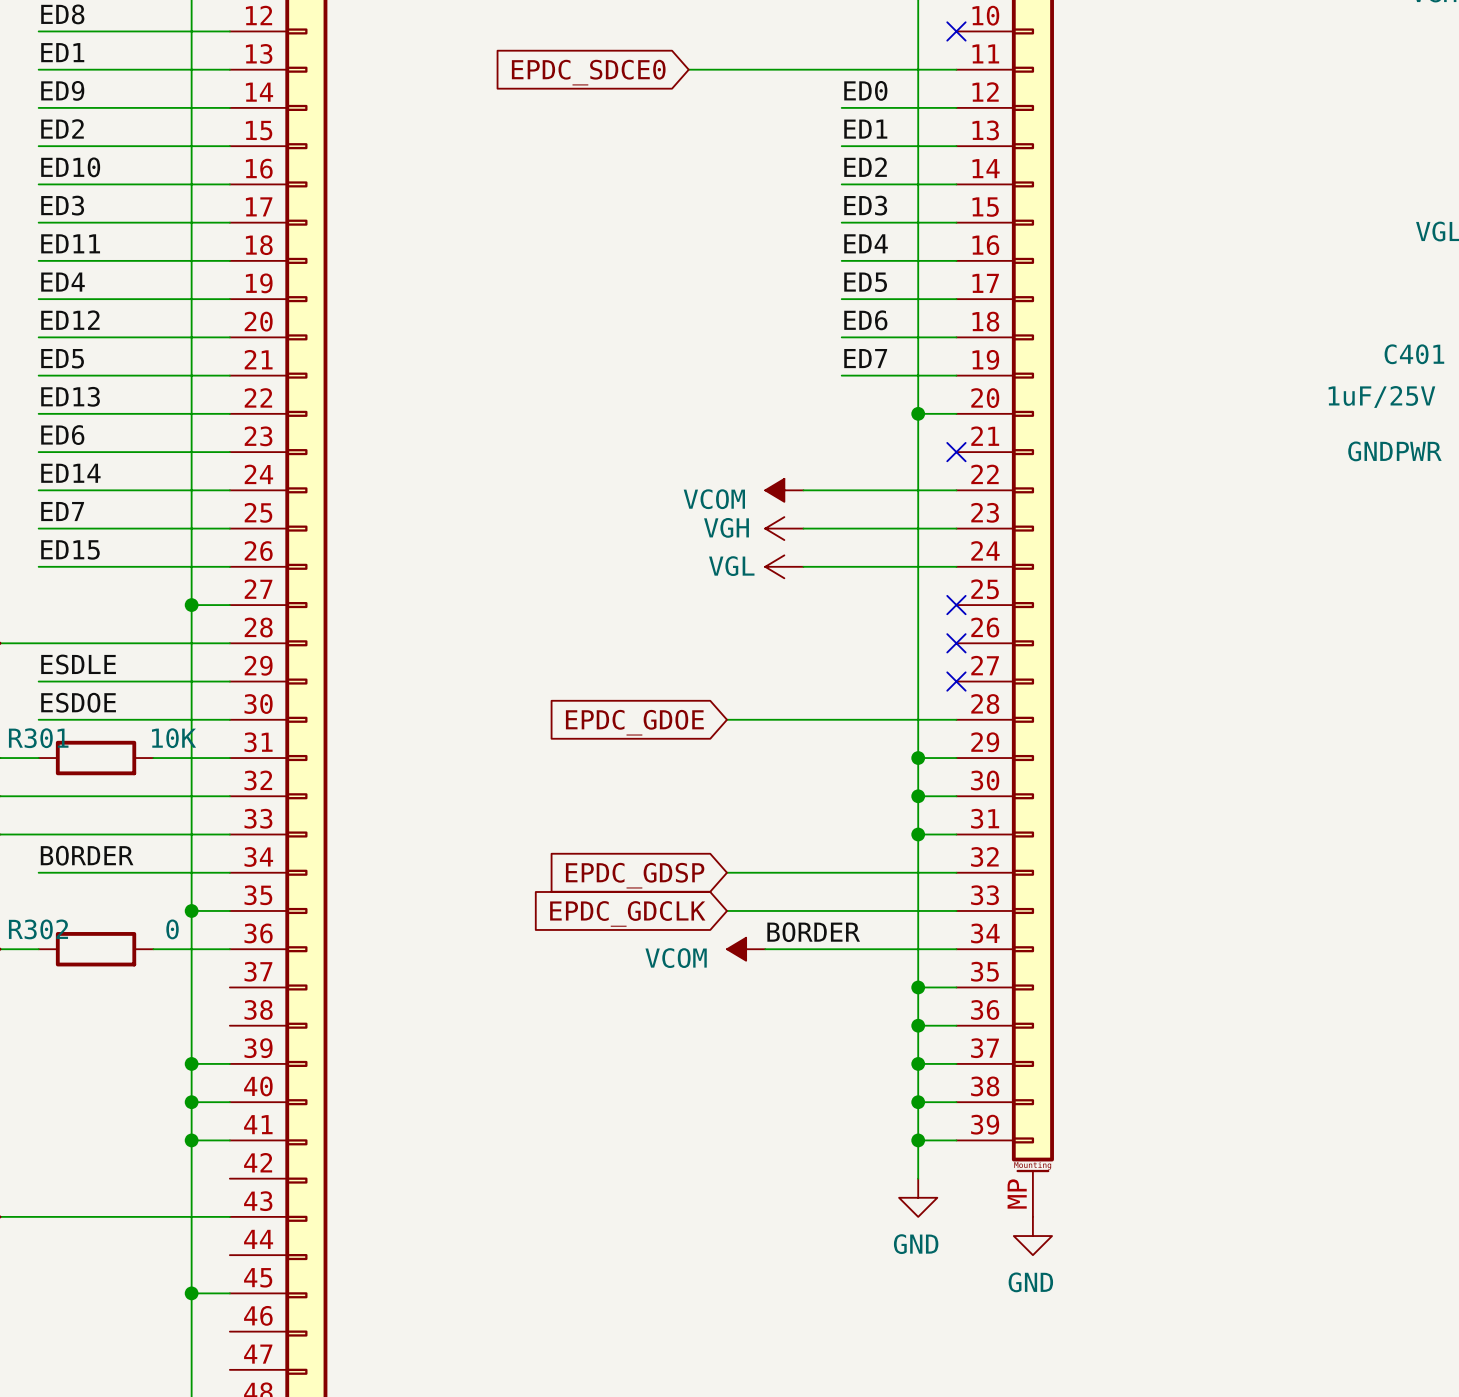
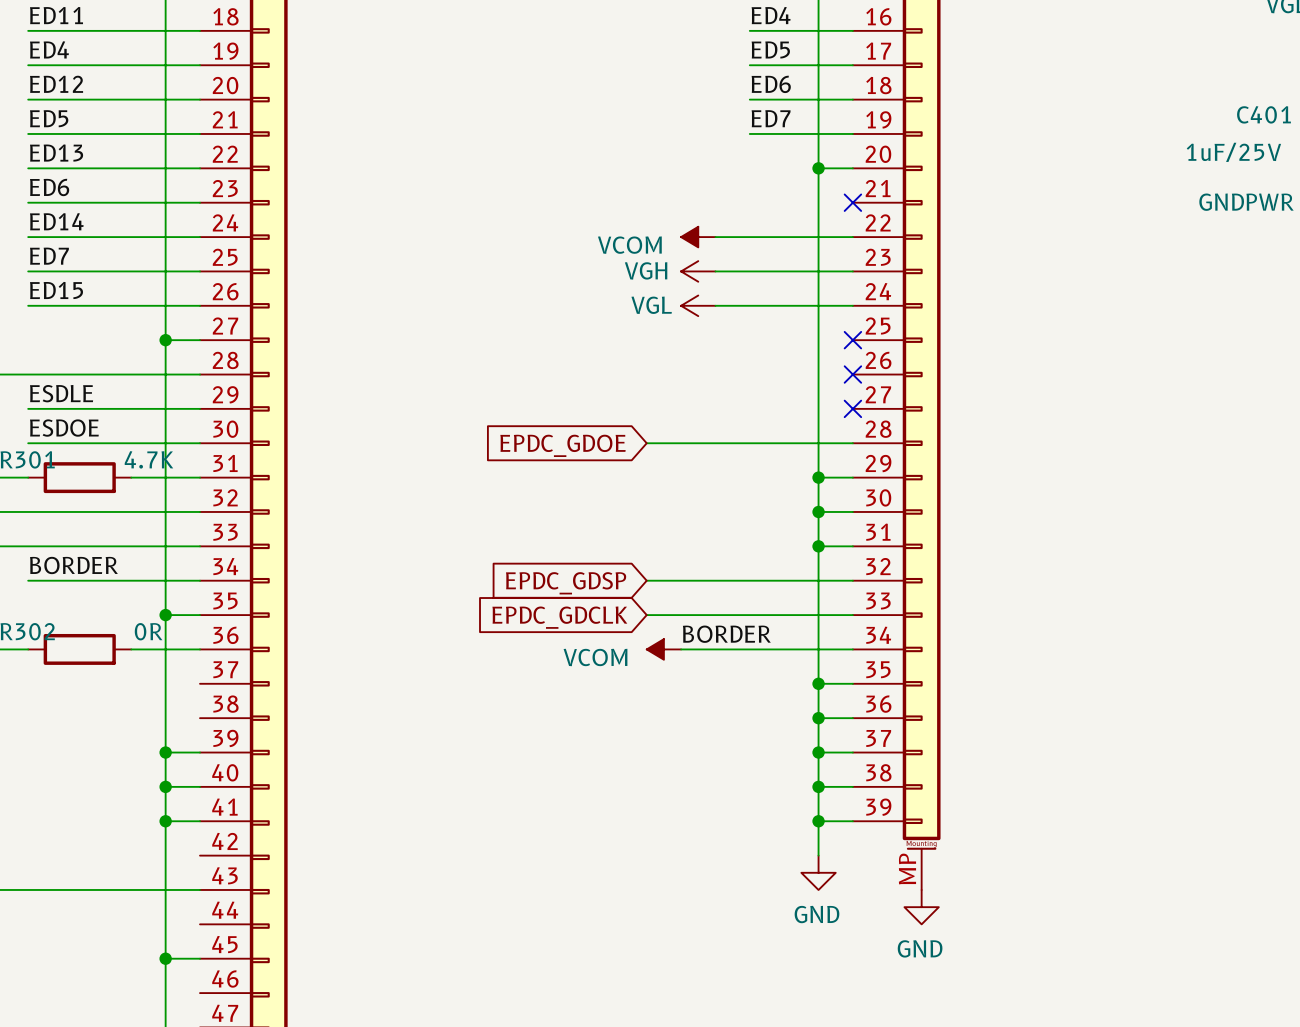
R301 value: 10K (174, 738) -> 4.7K (148, 459)
R302 value: 0 (172, 929) -> 0R (148, 631)

